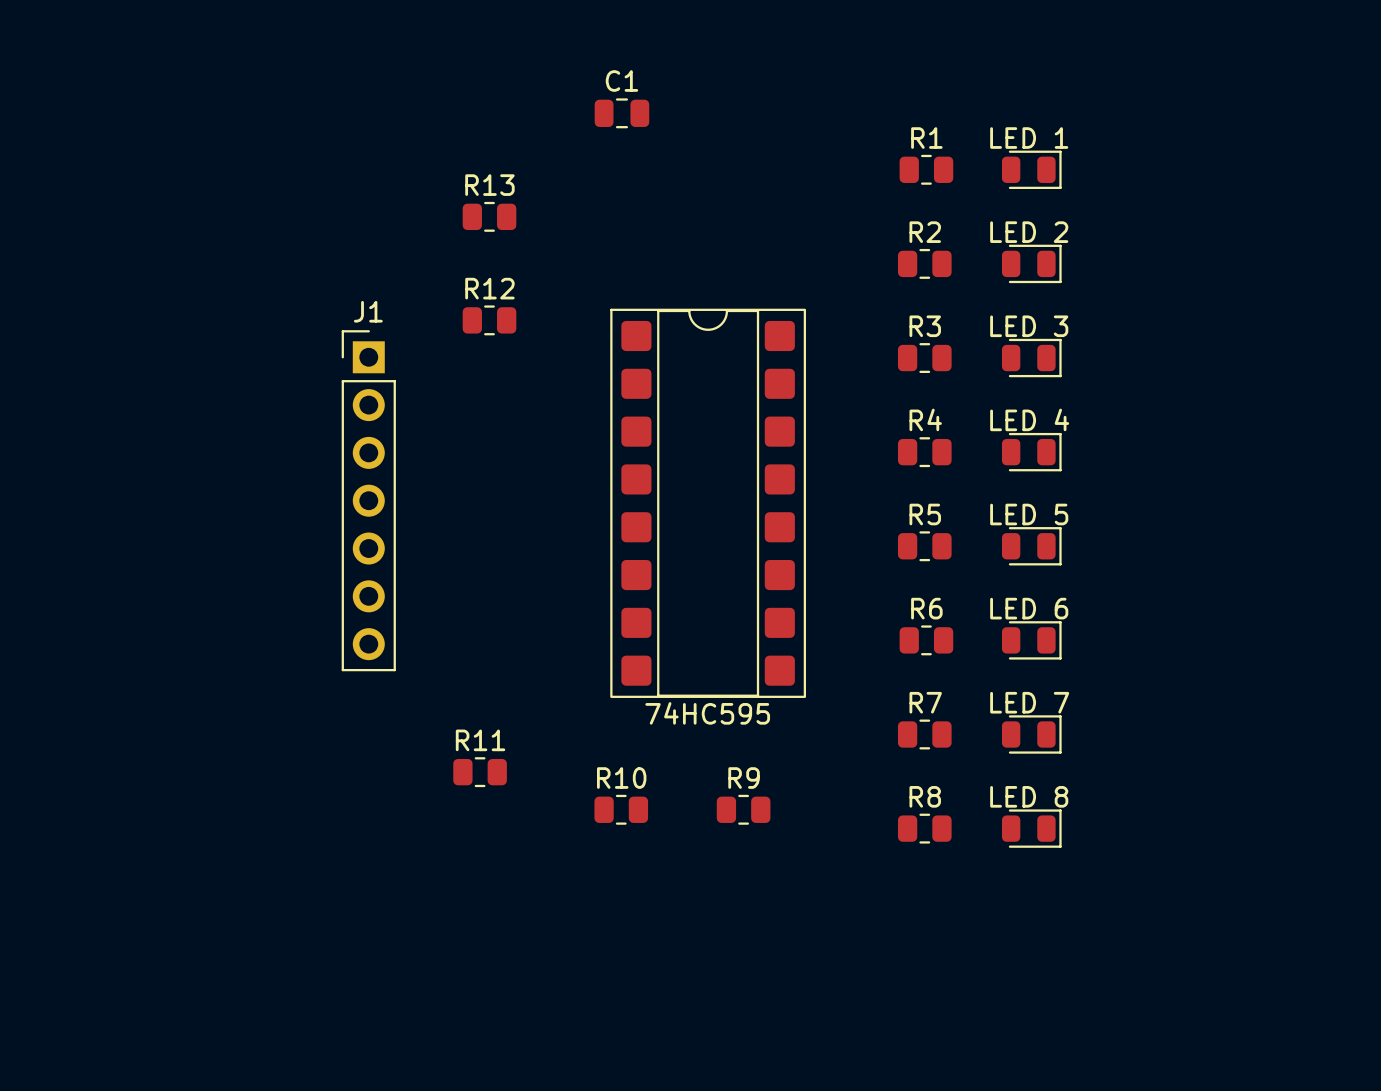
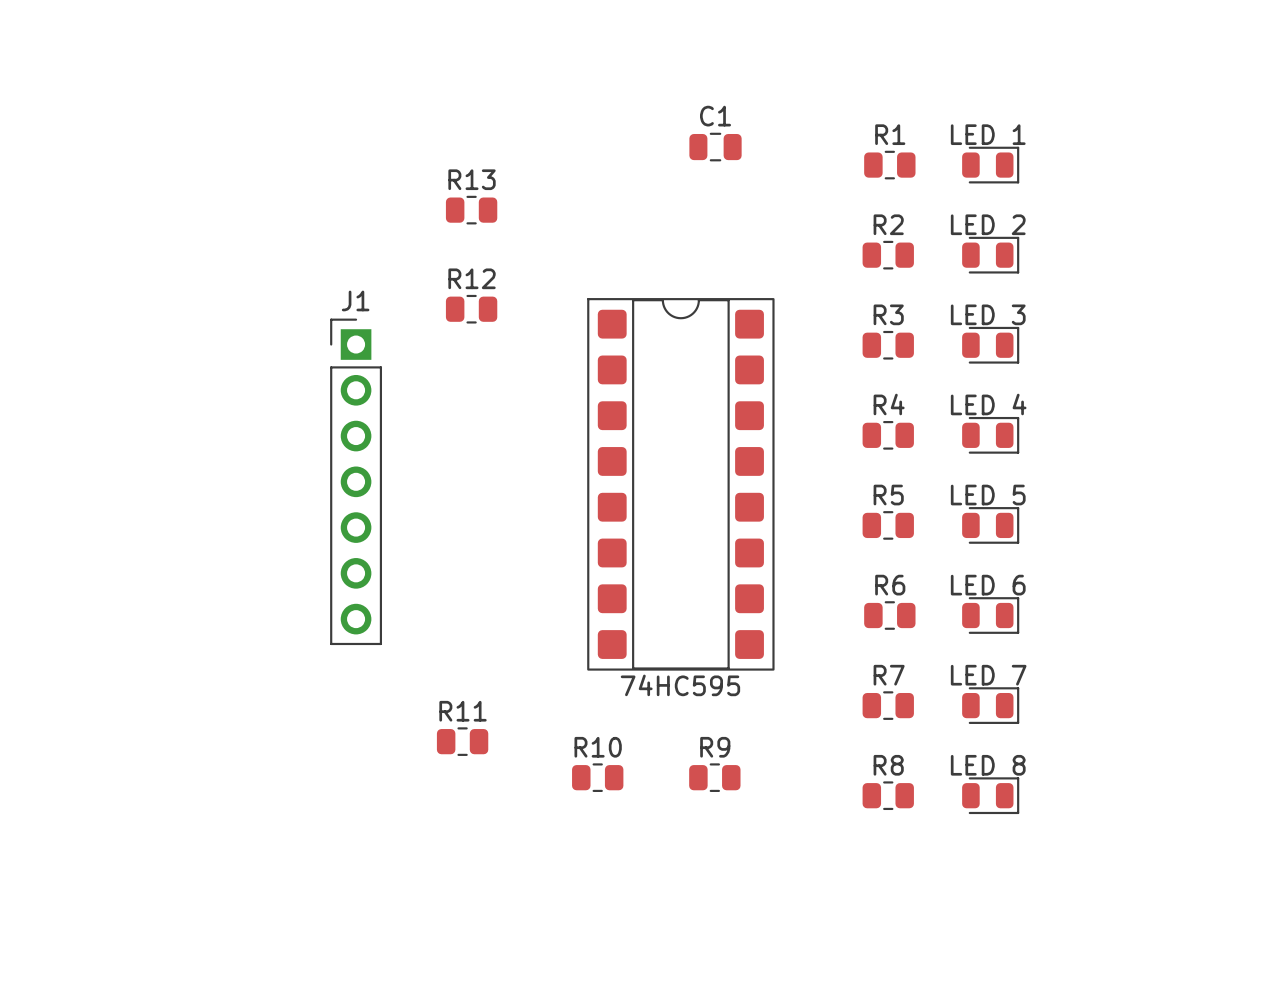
C1 position: (621, 113) -> (715, 147)

